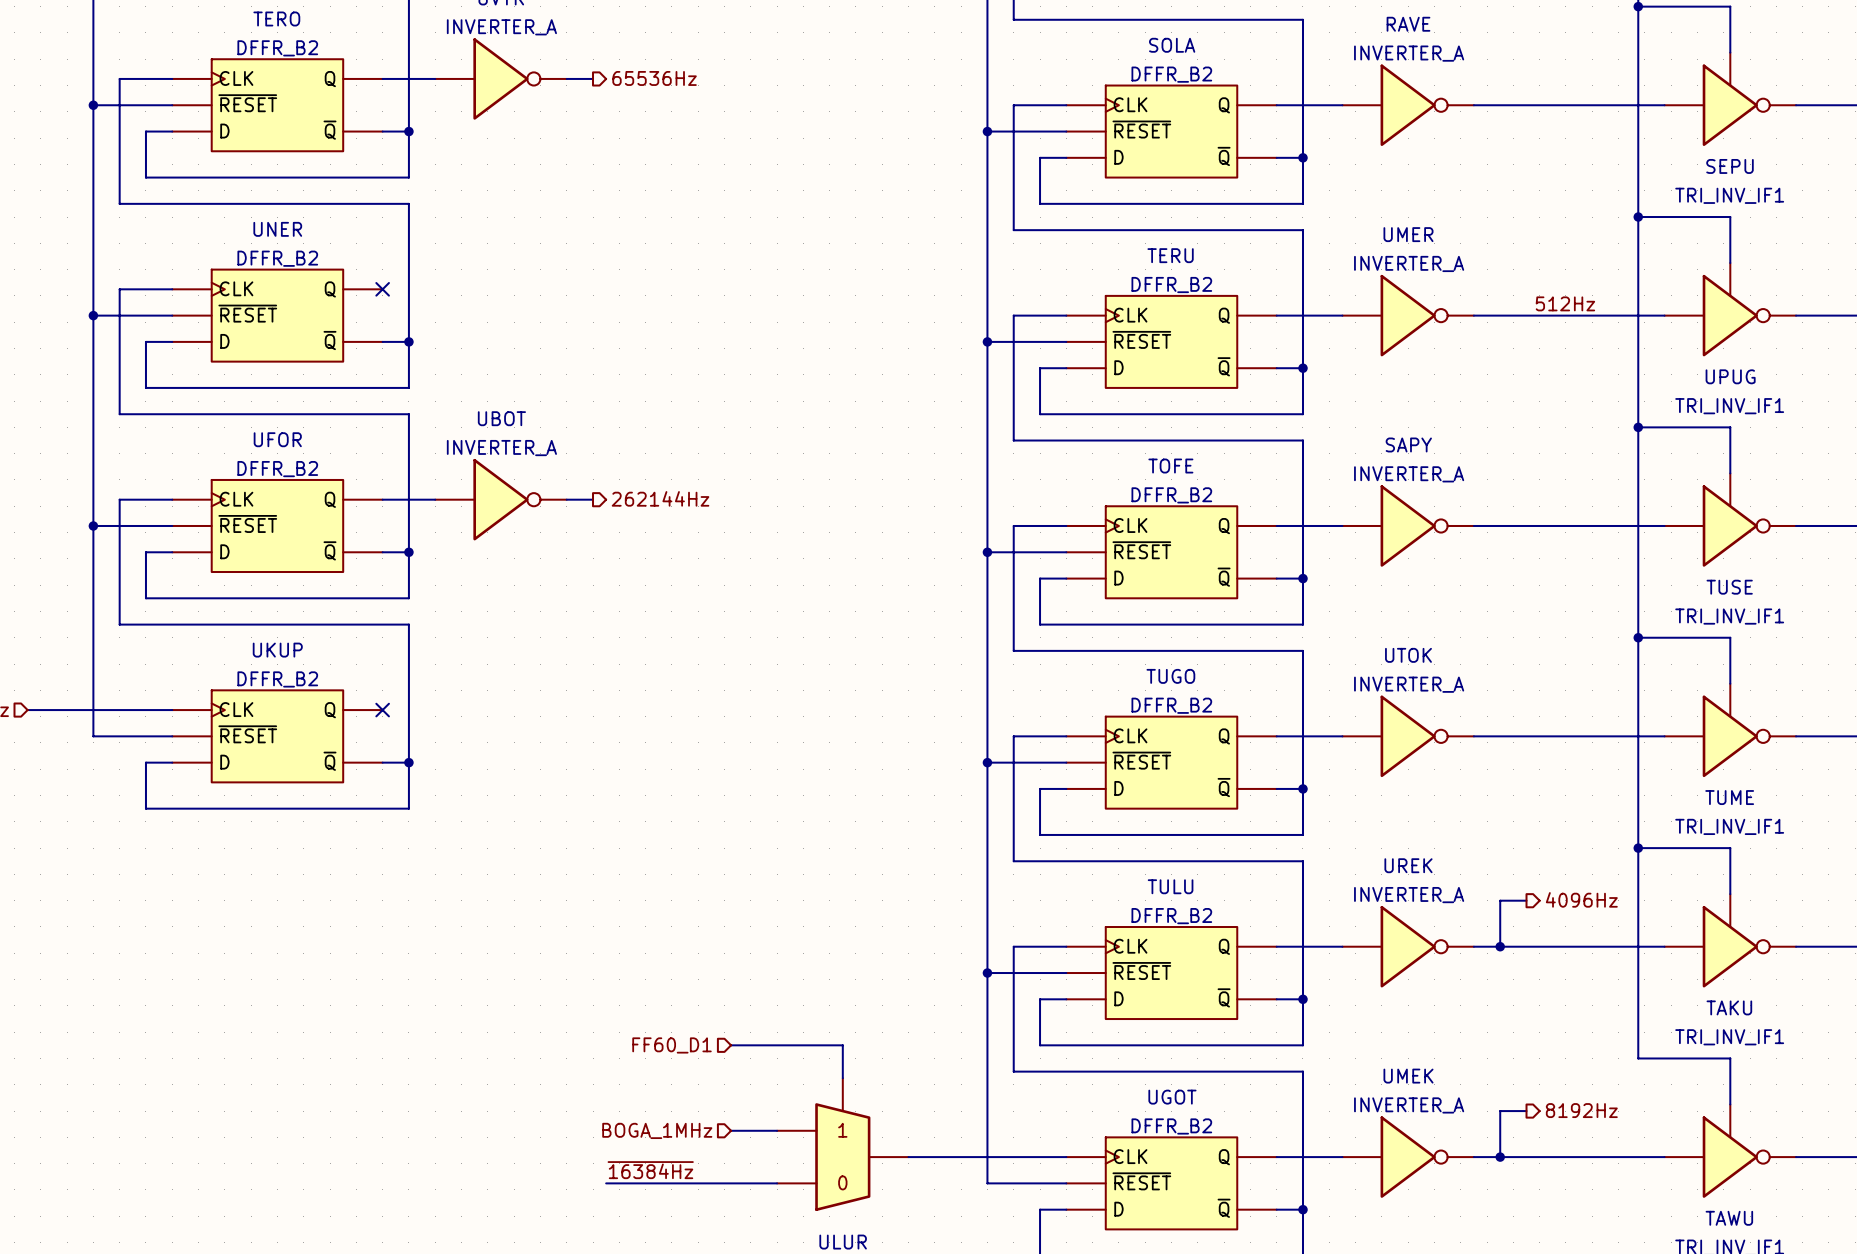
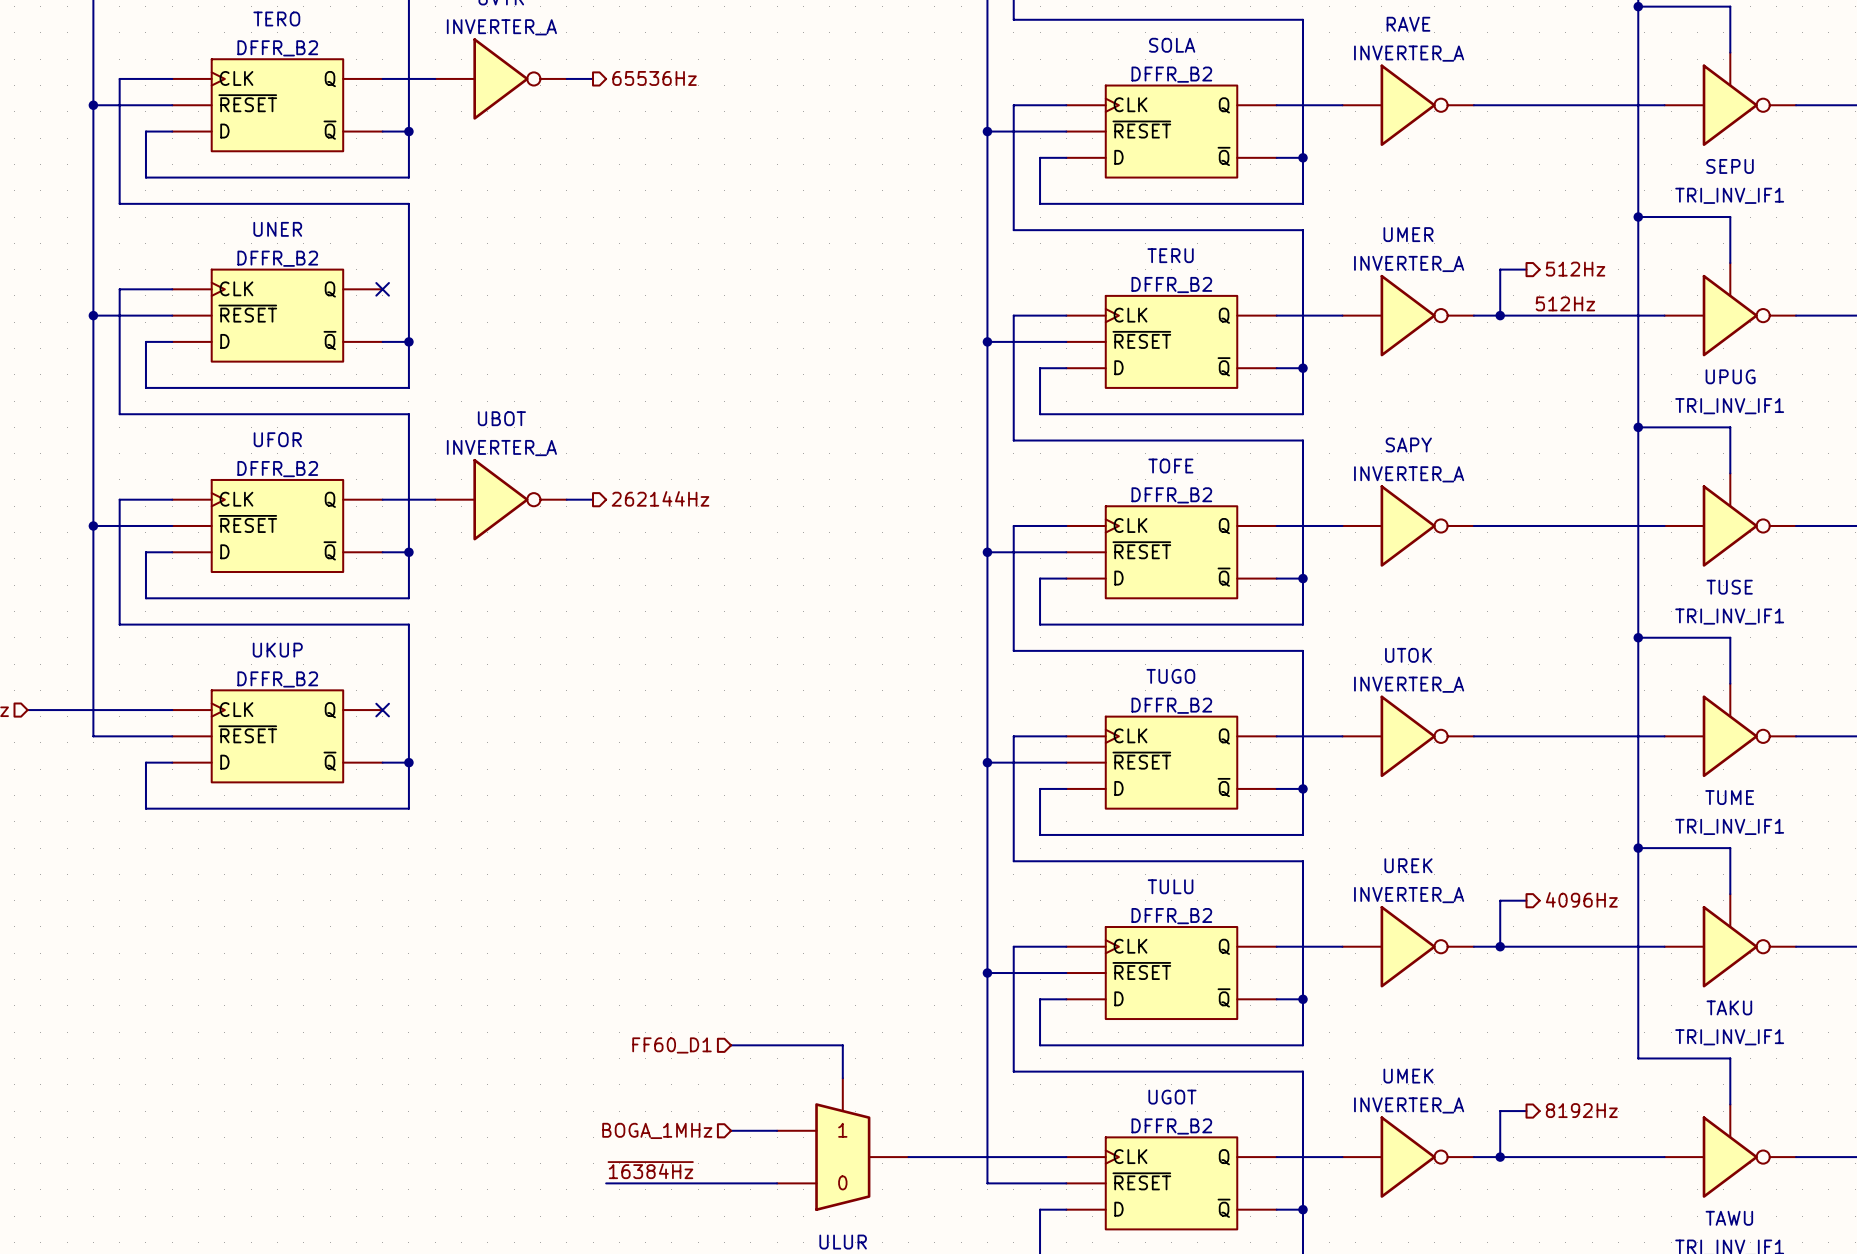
wire: none -> (1526, 269) (1500, 269) (1500, 315)
hierarchical label: none -> 512Hz (1575, 269)
junction: none -> (1500, 315)

